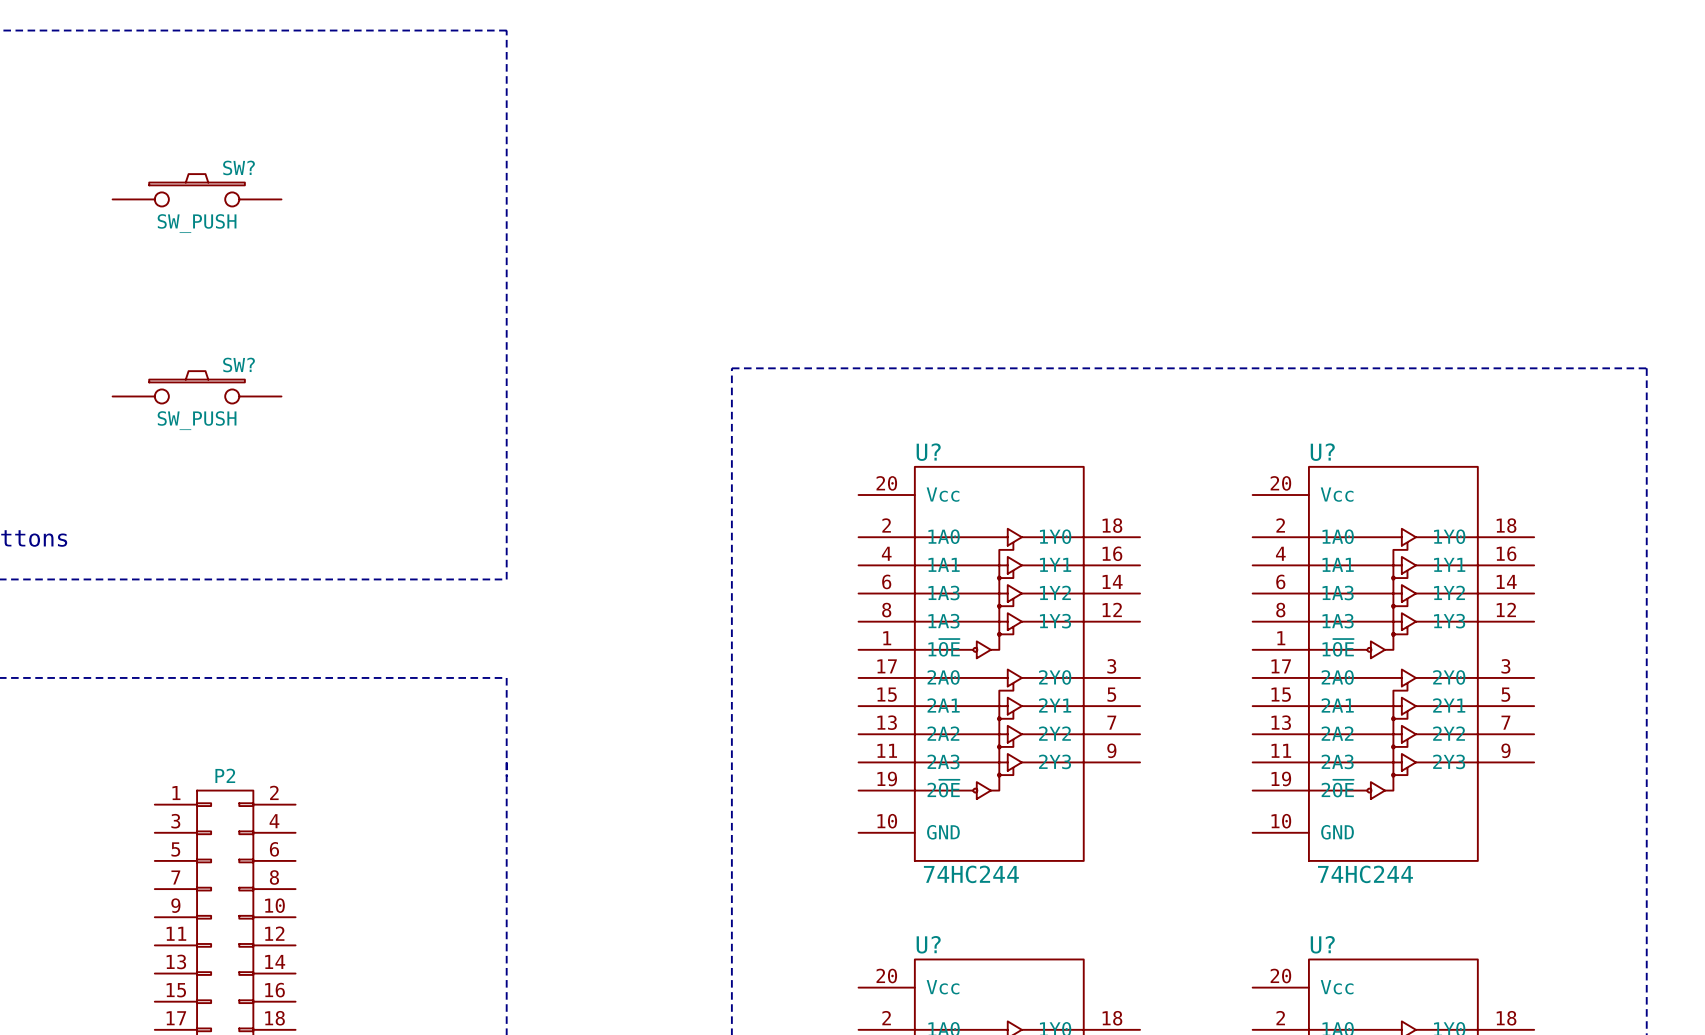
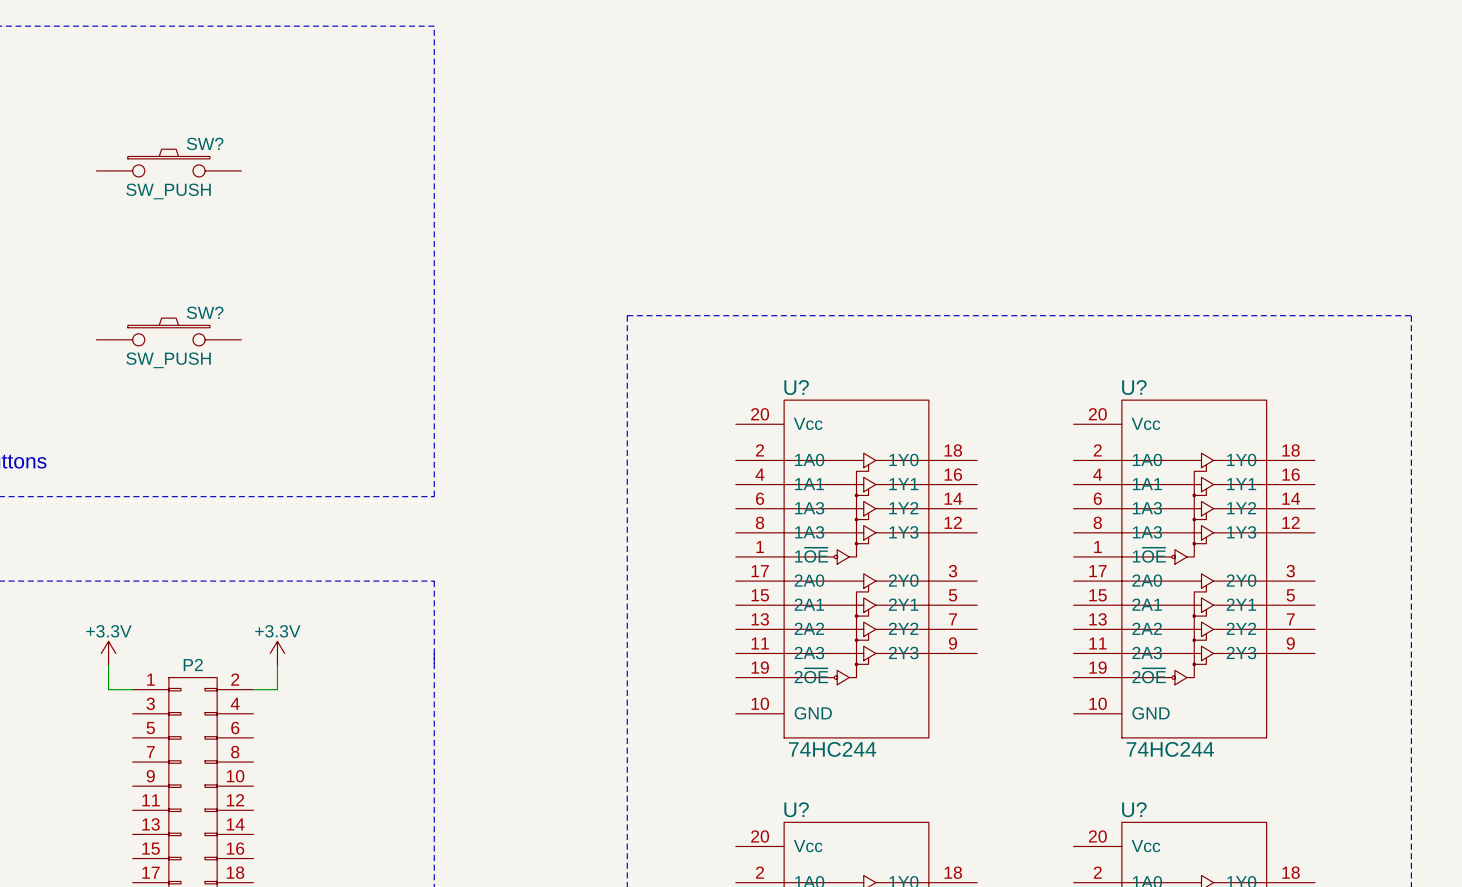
power symbol: none -> +3.3V (108, 653)
power symbol: none -> +3.3V (277, 653)
wire: none -> (108, 665) (108, 689) (132, 689)
wire: none -> (277, 665) (277, 689) (253, 689)

